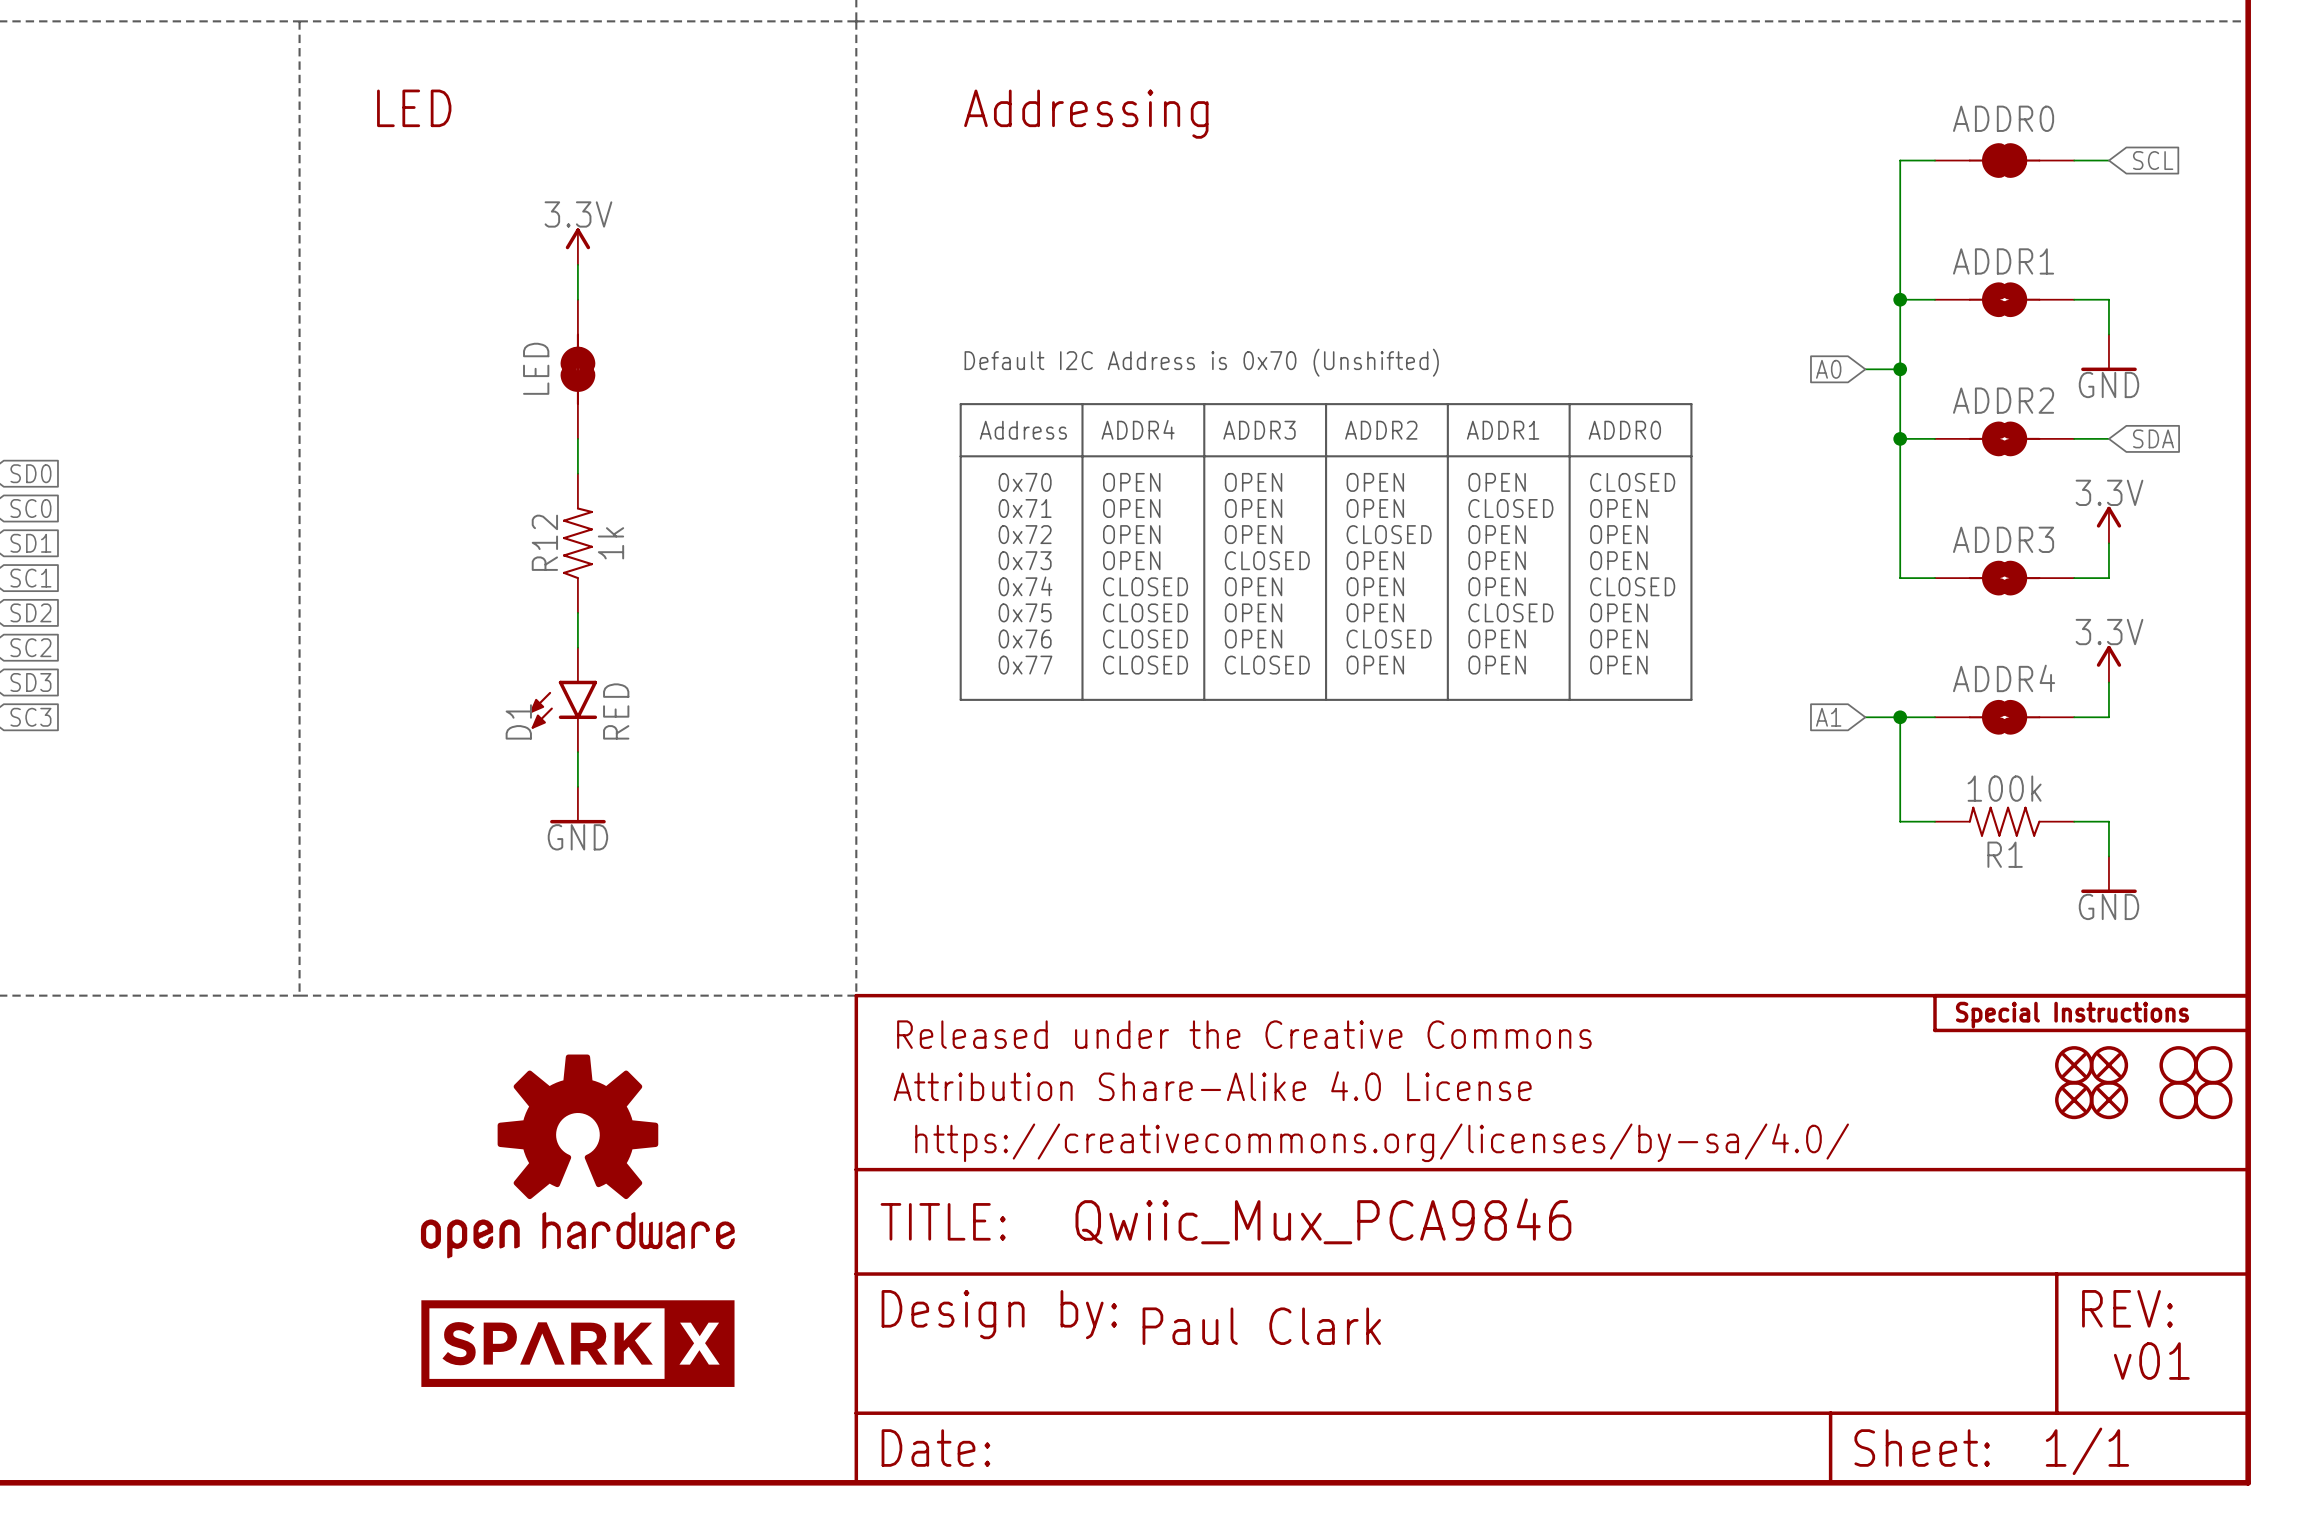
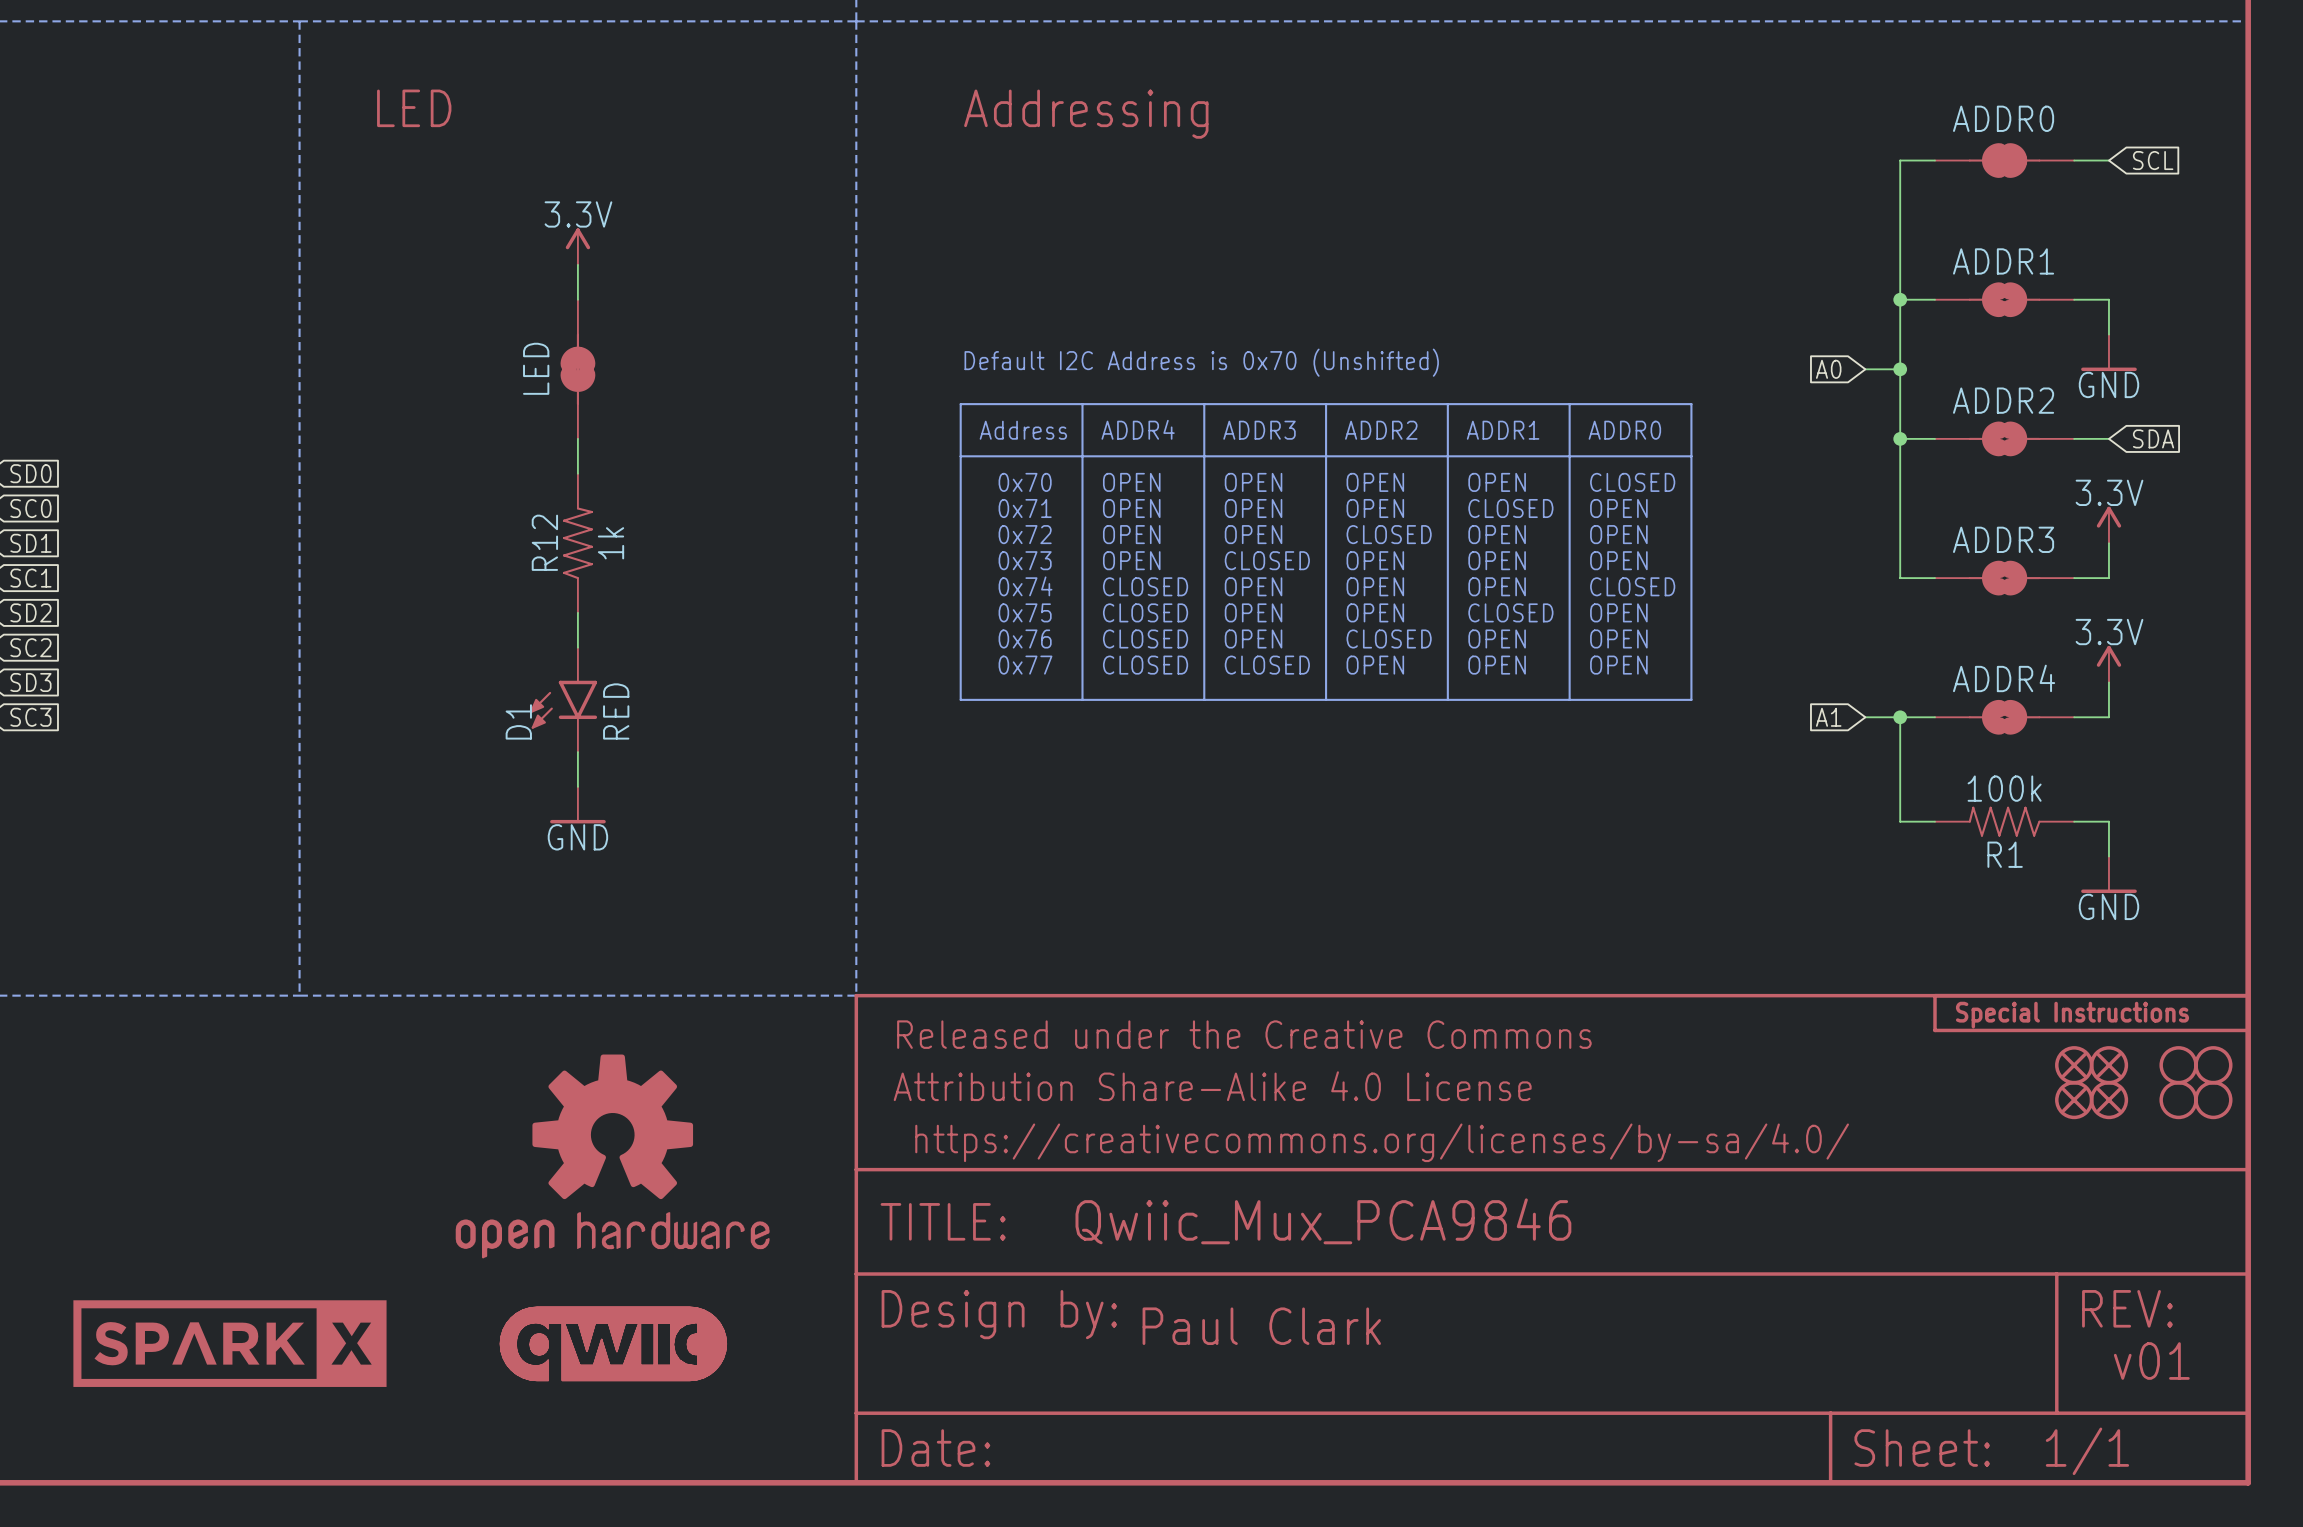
part position: (577, 1156) -> (612, 1156)
part: none -> (229, 1343)
part: (577, 1343) -> none
part: none -> (613, 1343)

